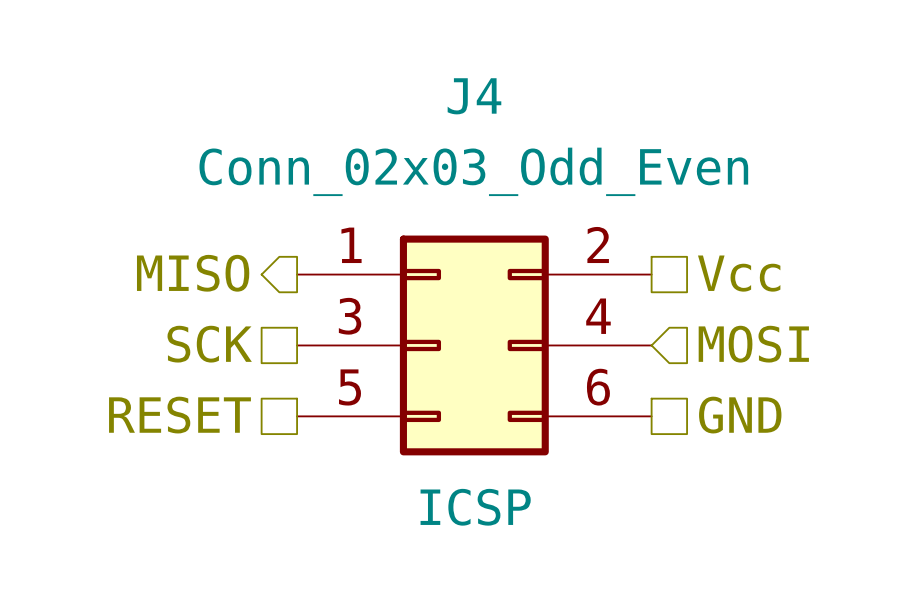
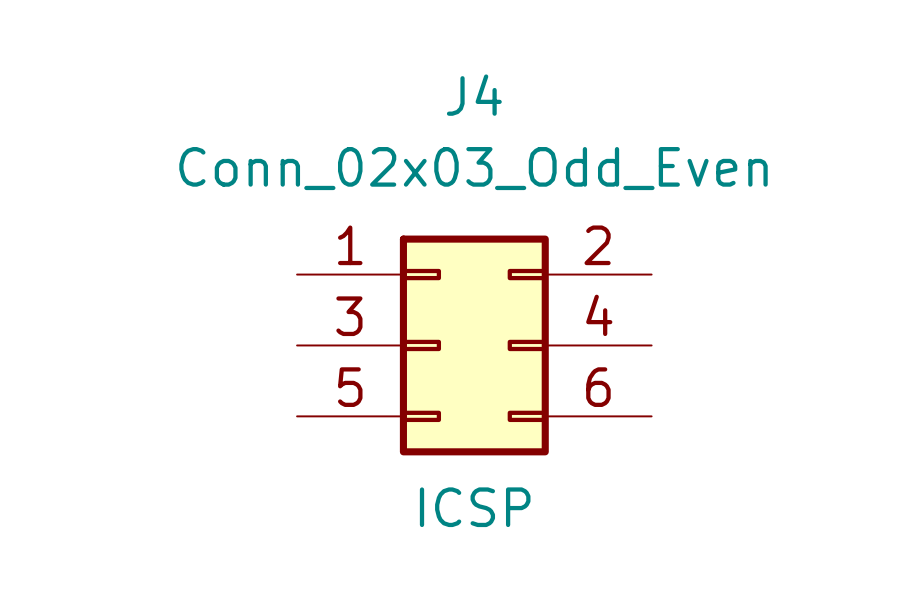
hierarchical label: MISO (193, 273) -> none
hierarchical label: Vcc (739, 273) -> none
hierarchical label: SCK (209, 344) -> none
hierarchical label: MOSI (753, 344) -> none
hierarchical label: RESET (179, 415) -> none
hierarchical label: GND (740, 415) -> none

